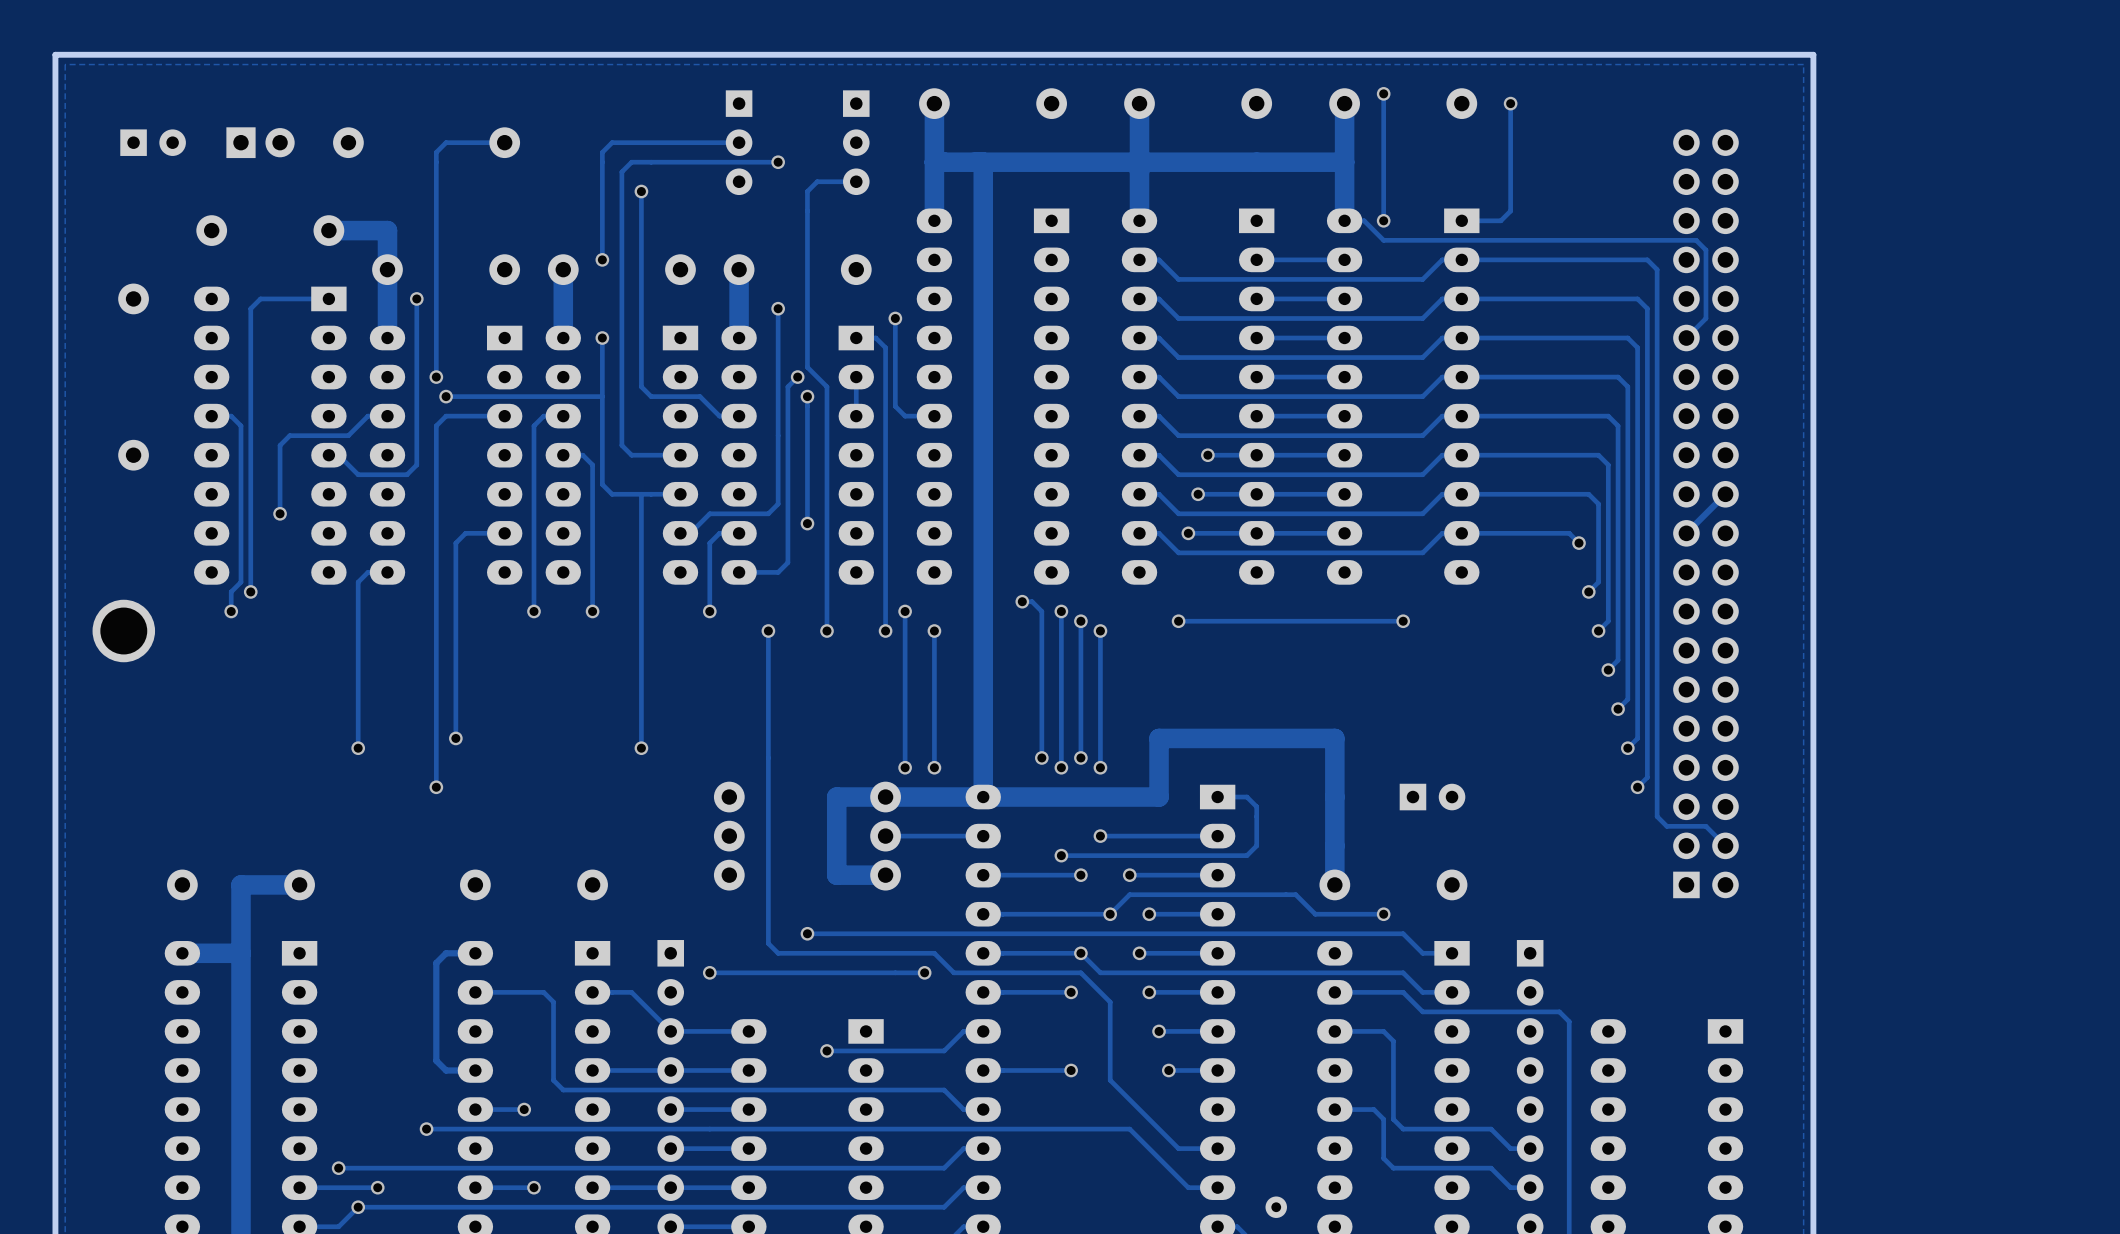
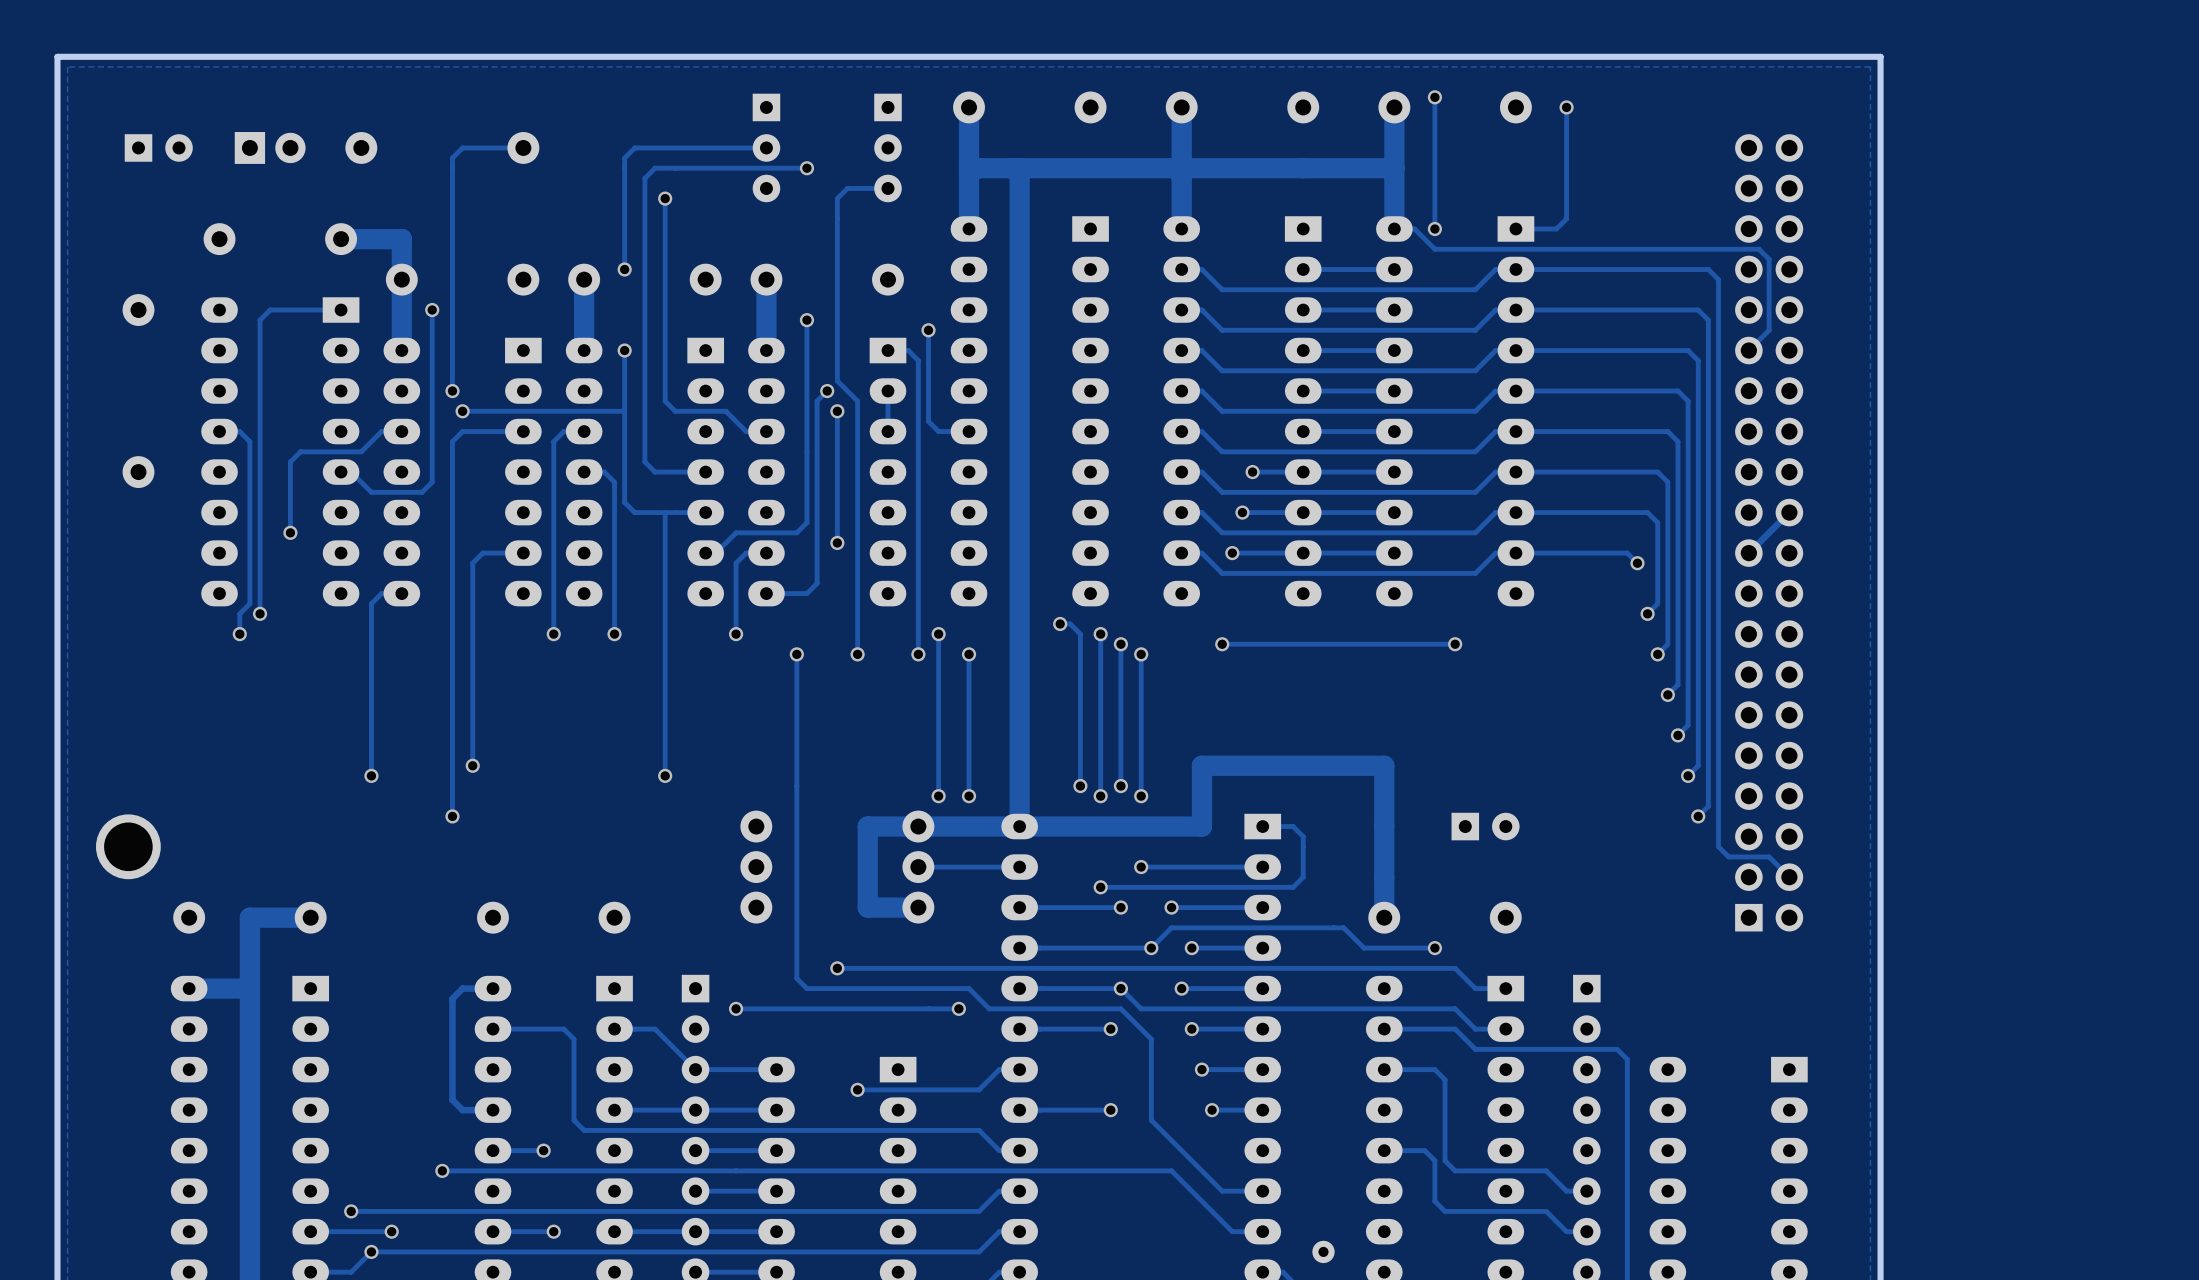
part position: (123, 631) -> (128, 846)

